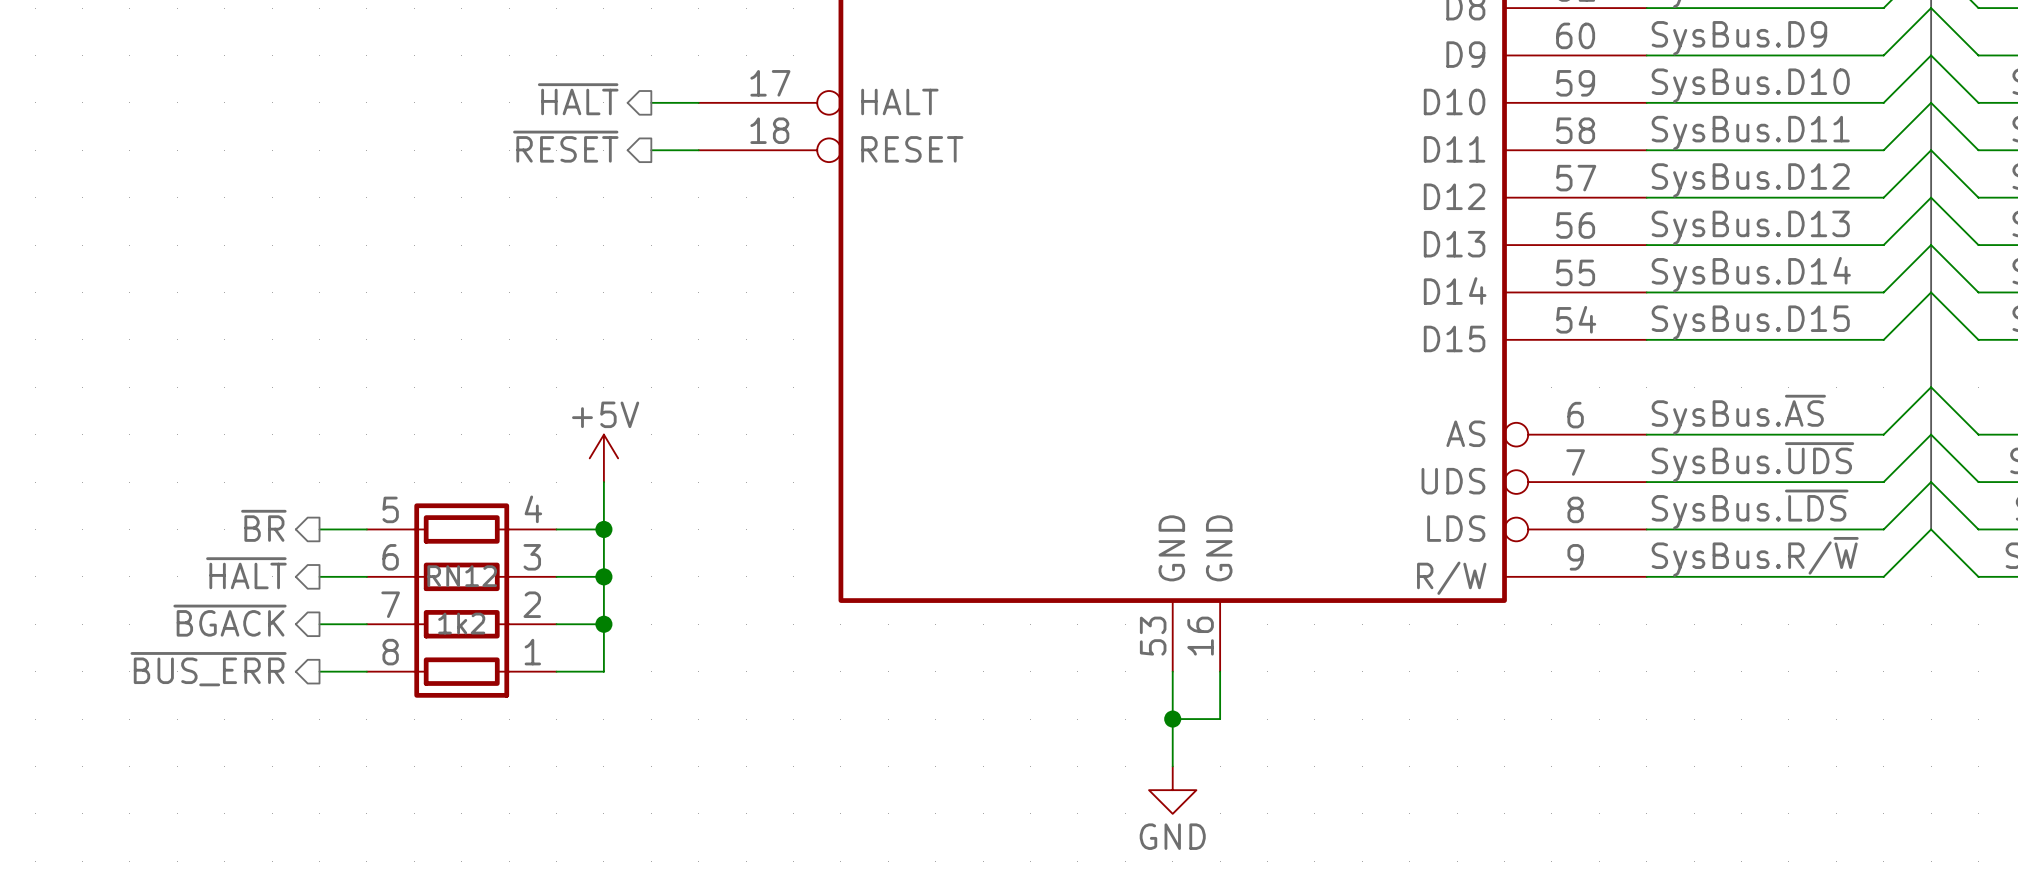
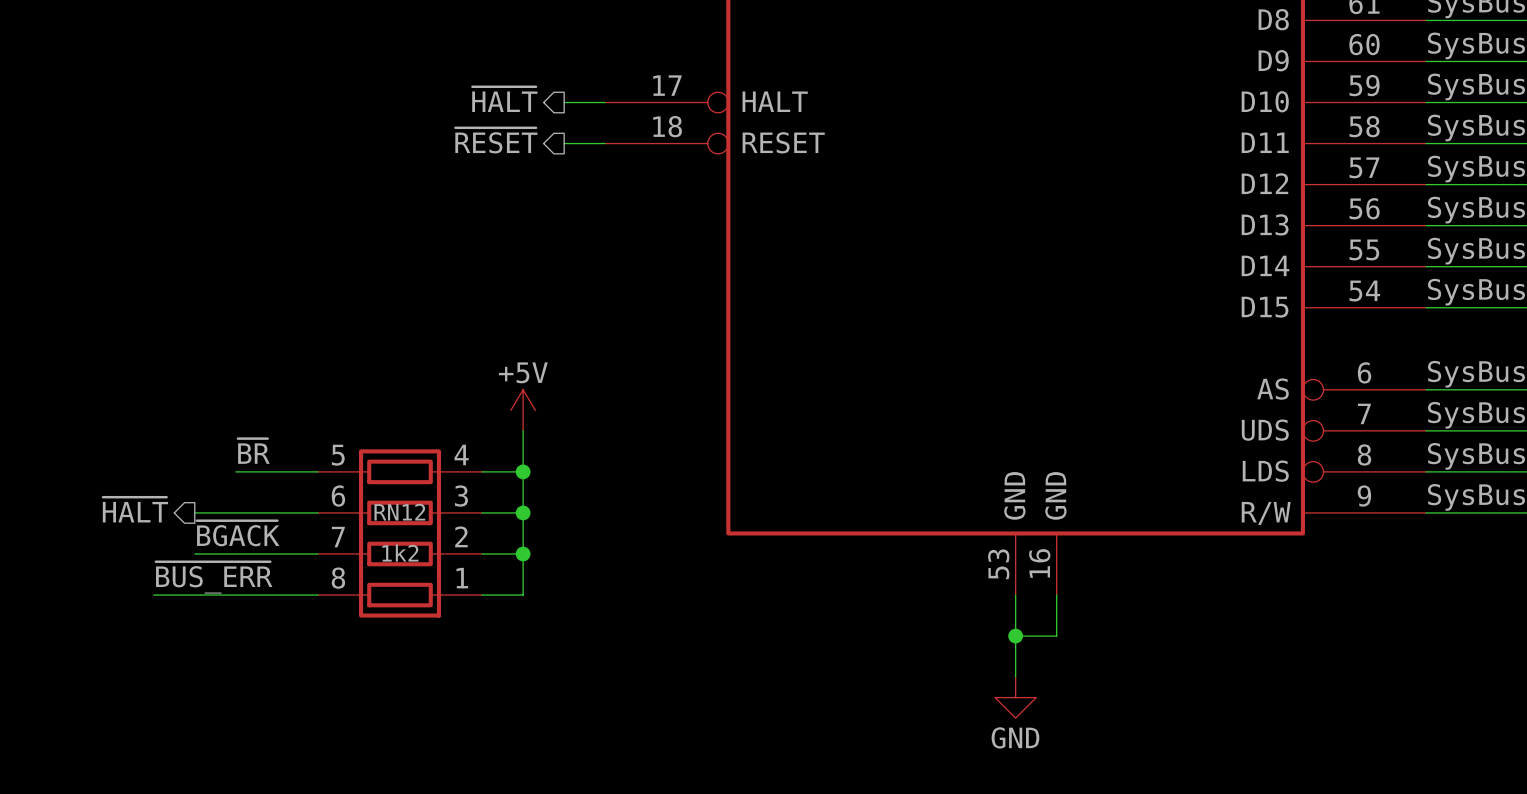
label: none -> ~{BR} (253, 451)
hierarchical label: ~{BR} (263, 525) -> none
wire: none -> (235, 471) (276, 471)
hierarchical label position: ~{HALT} (246, 573) -> ~{HALT} (135, 509)
wire: none -> (194, 512) (276, 512)
label: none -> ~{BGACK} (238, 533)
hierarchical label: ~{BGACK} (230, 620) -> none
wire: none -> (194, 553) (276, 553)
label: none -> ~{BUS_ERR} (214, 577)
hierarchical label: ~{BUS_ERR} (208, 669) -> none
wire: none -> (153, 595) (276, 595)

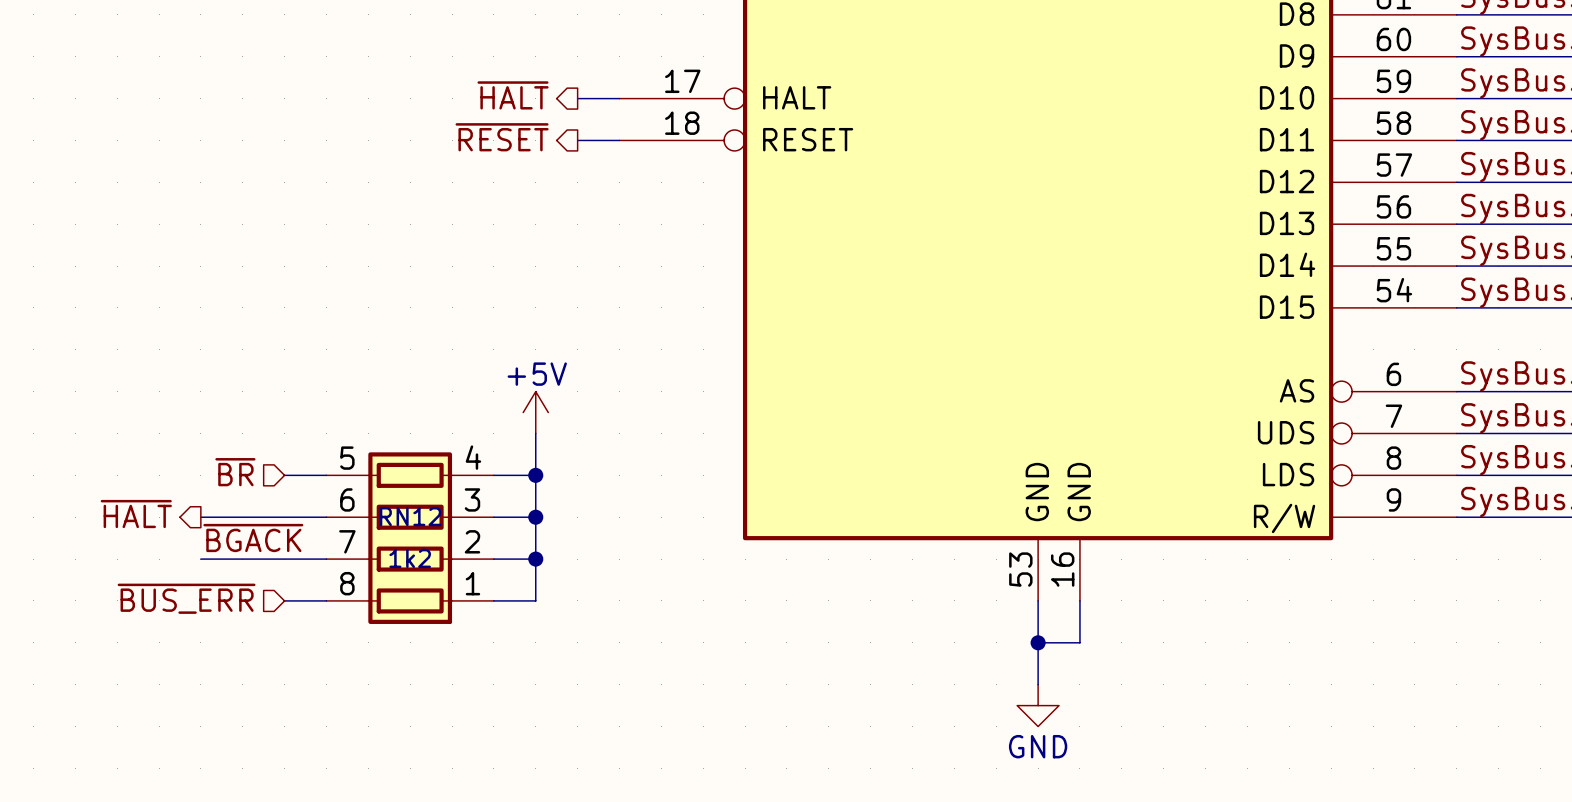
label: ~{BR} (253, 451) -> none
hierarchical label: none -> ~{BR} (235, 472)
wire: (235, 471) (276, 471) -> none
label: ~{BUS_ERR} (214, 577) -> none
wire: (153, 595) (276, 595) -> none
hierarchical label: none -> ~{BUS_ERR} (186, 598)

